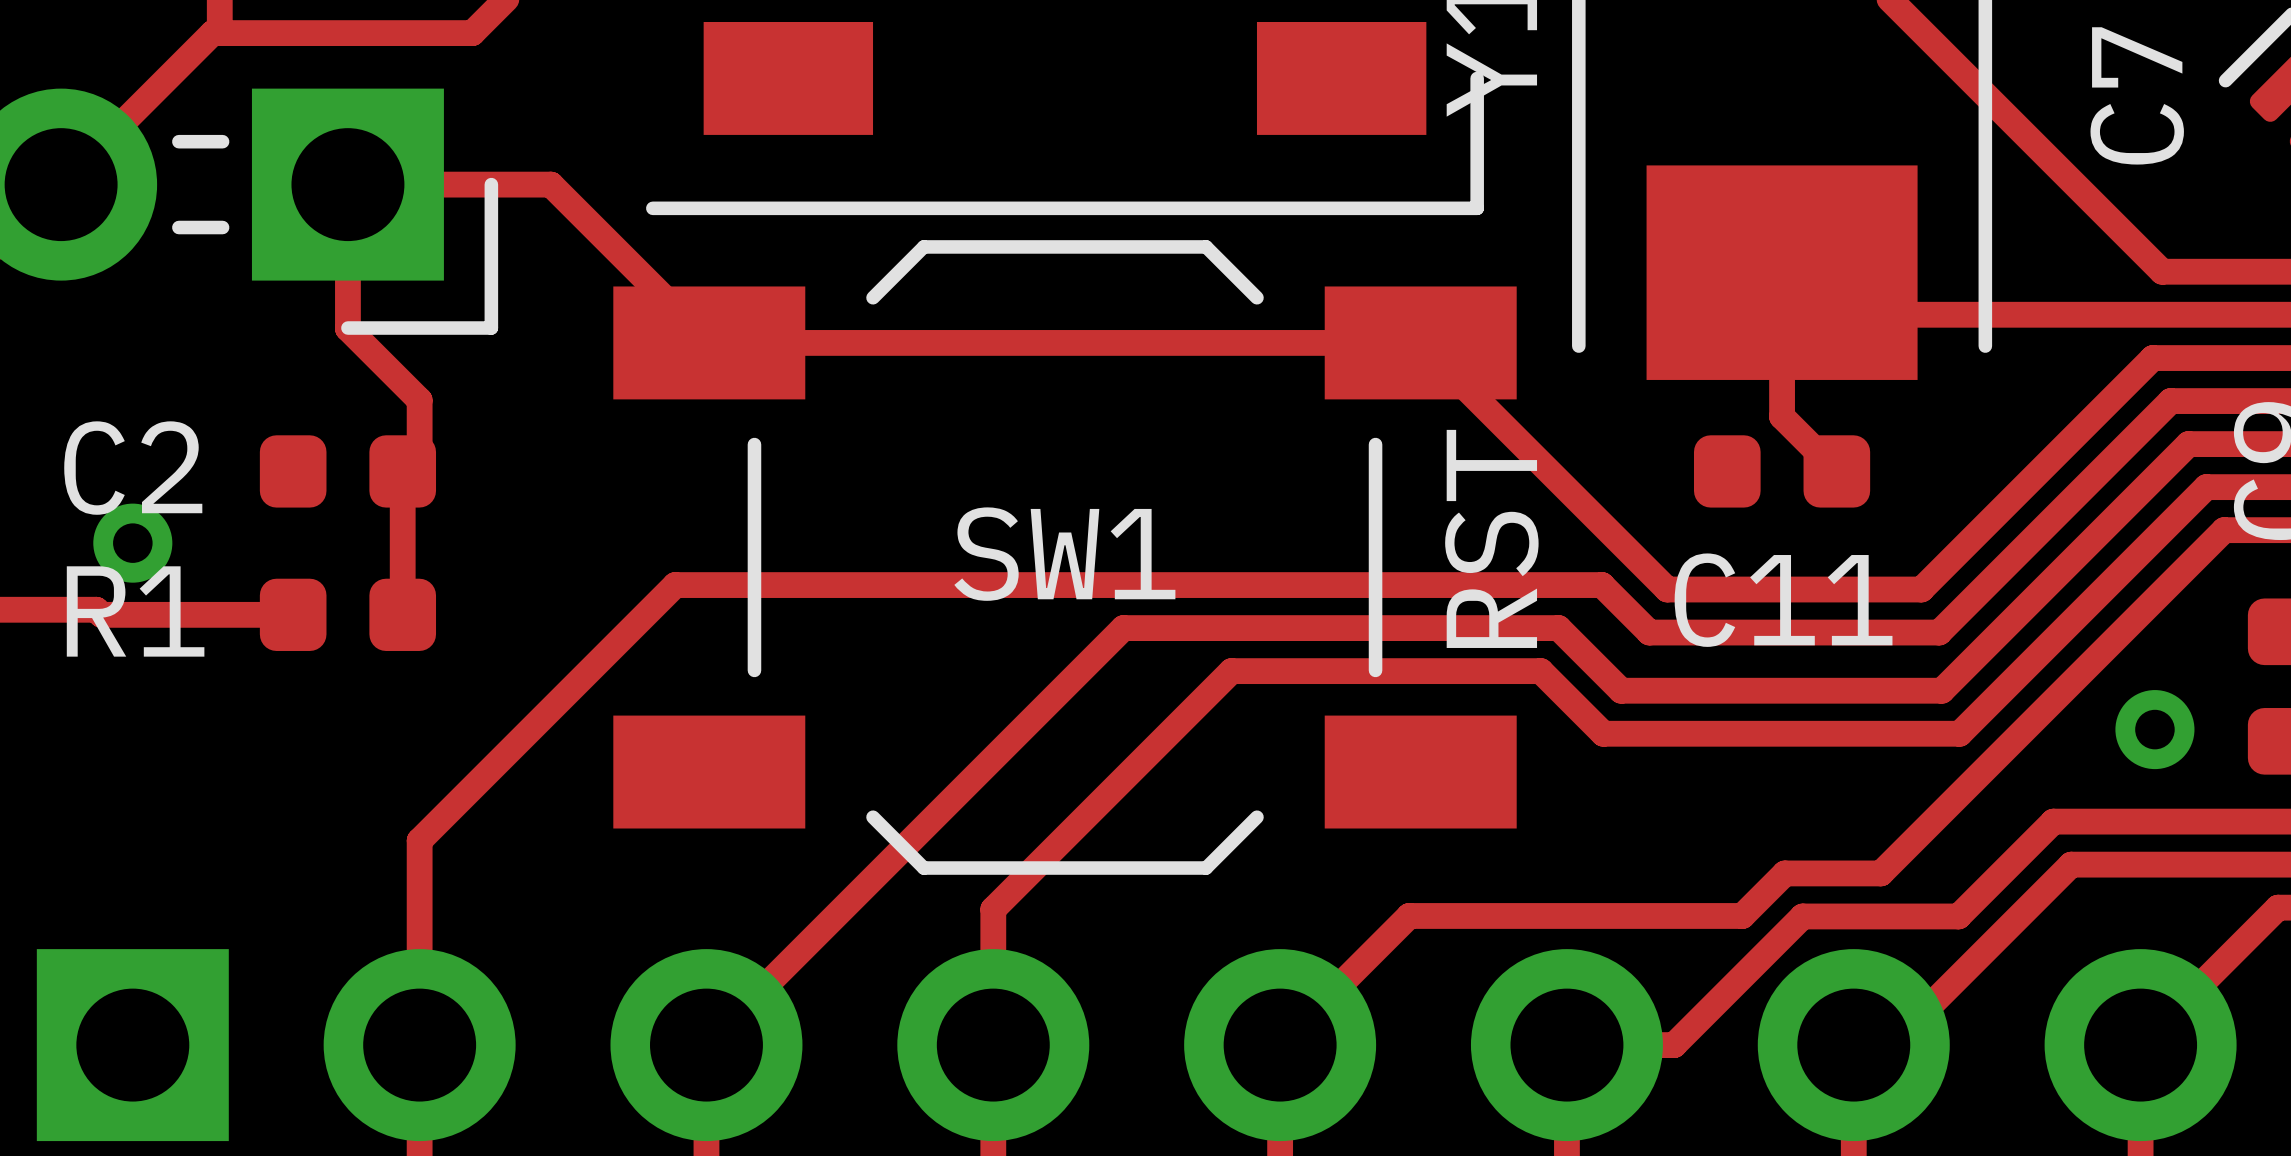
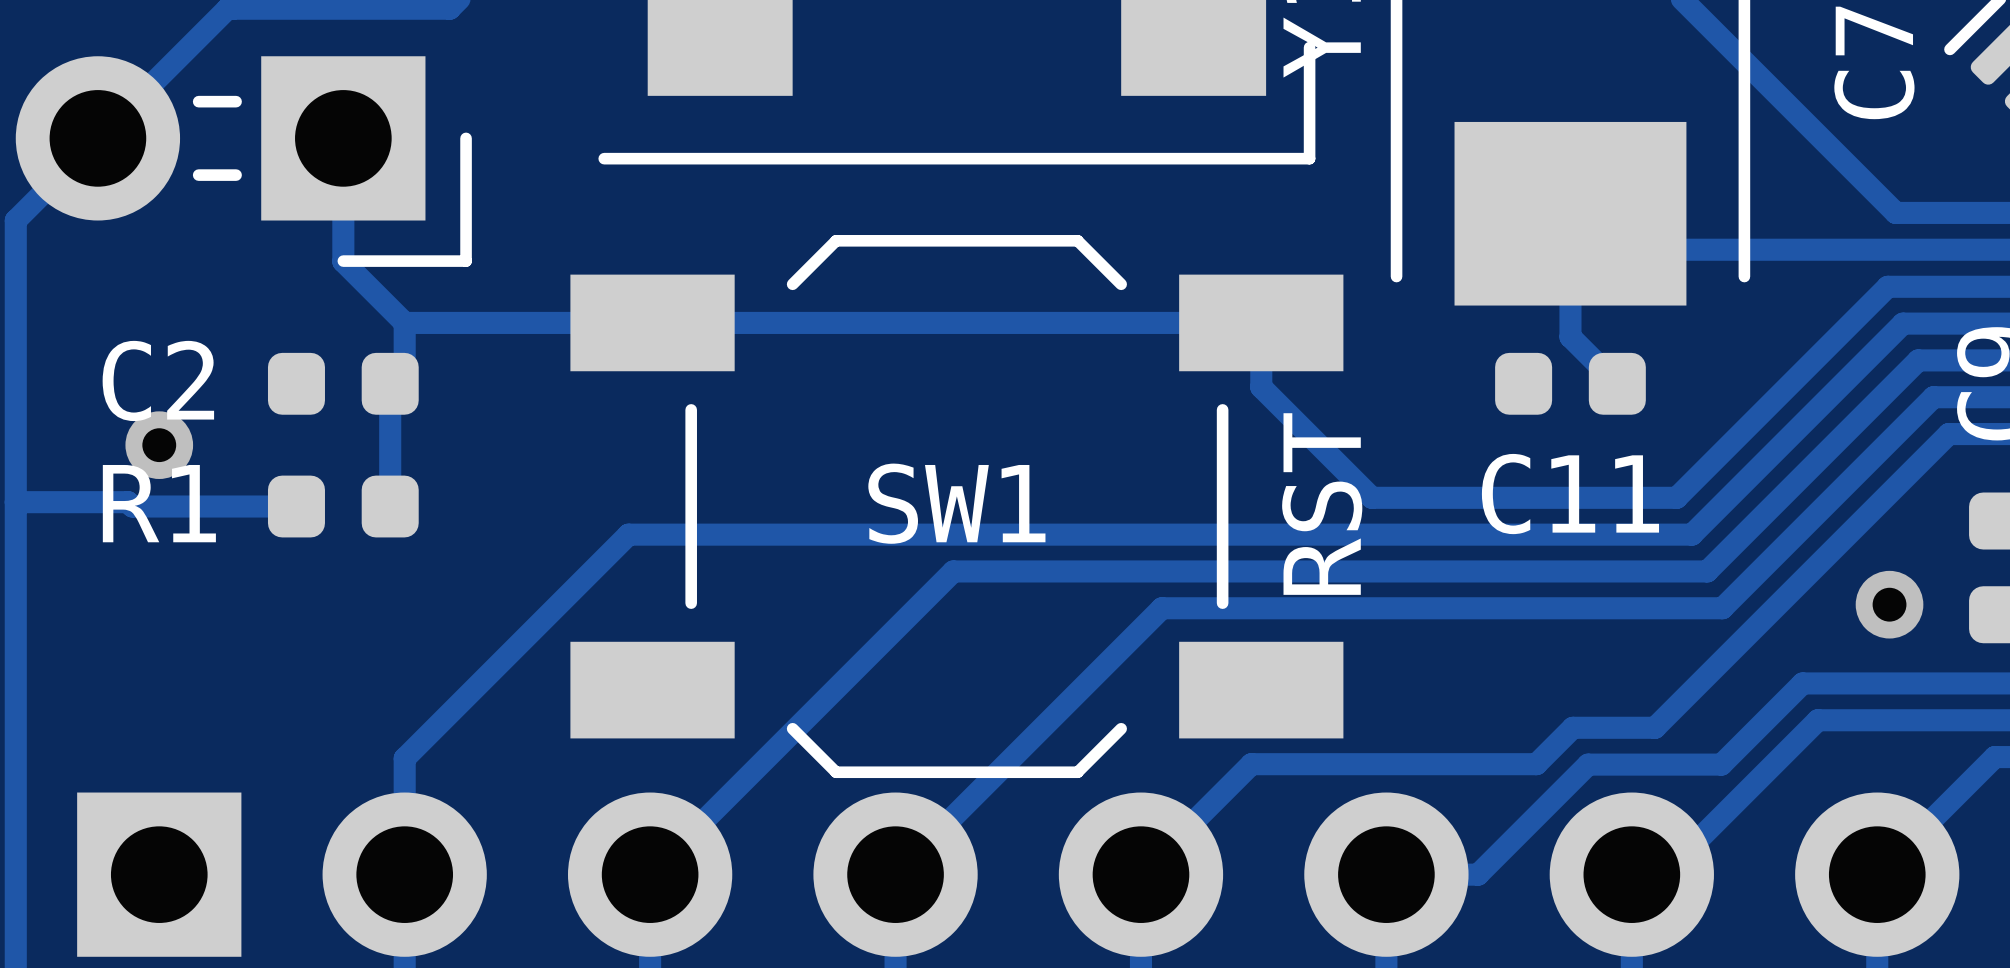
track: (347, 184) (550, 184) (709, 342) (1420, 342) (1667, 589) (1921, 589) -> (404, 322) (1261, 322) (1261, 387) (1371, 497) (1676, 497) (1689, 484)
text position: RST (1491, 538) -> RST (1322, 504)
SW1 position: (1065, 557) -> (956, 506)
track: (1939, 632) (1649, 632) (1602, 585) (675, 585) (419, 840) (419, 909) -> (1704, 521) (1691, 534) (628, 534) (404, 758)
track: (1060, 690) (1123, 628) (1558, 628) (1621, 690) -> (953, 571) (1432, 571)
track: (1603, 733) (1540, 671) (1231, 671) (993, 909) (993, 1045) -> (1417, 608) (1161, 608) (895, 874)

